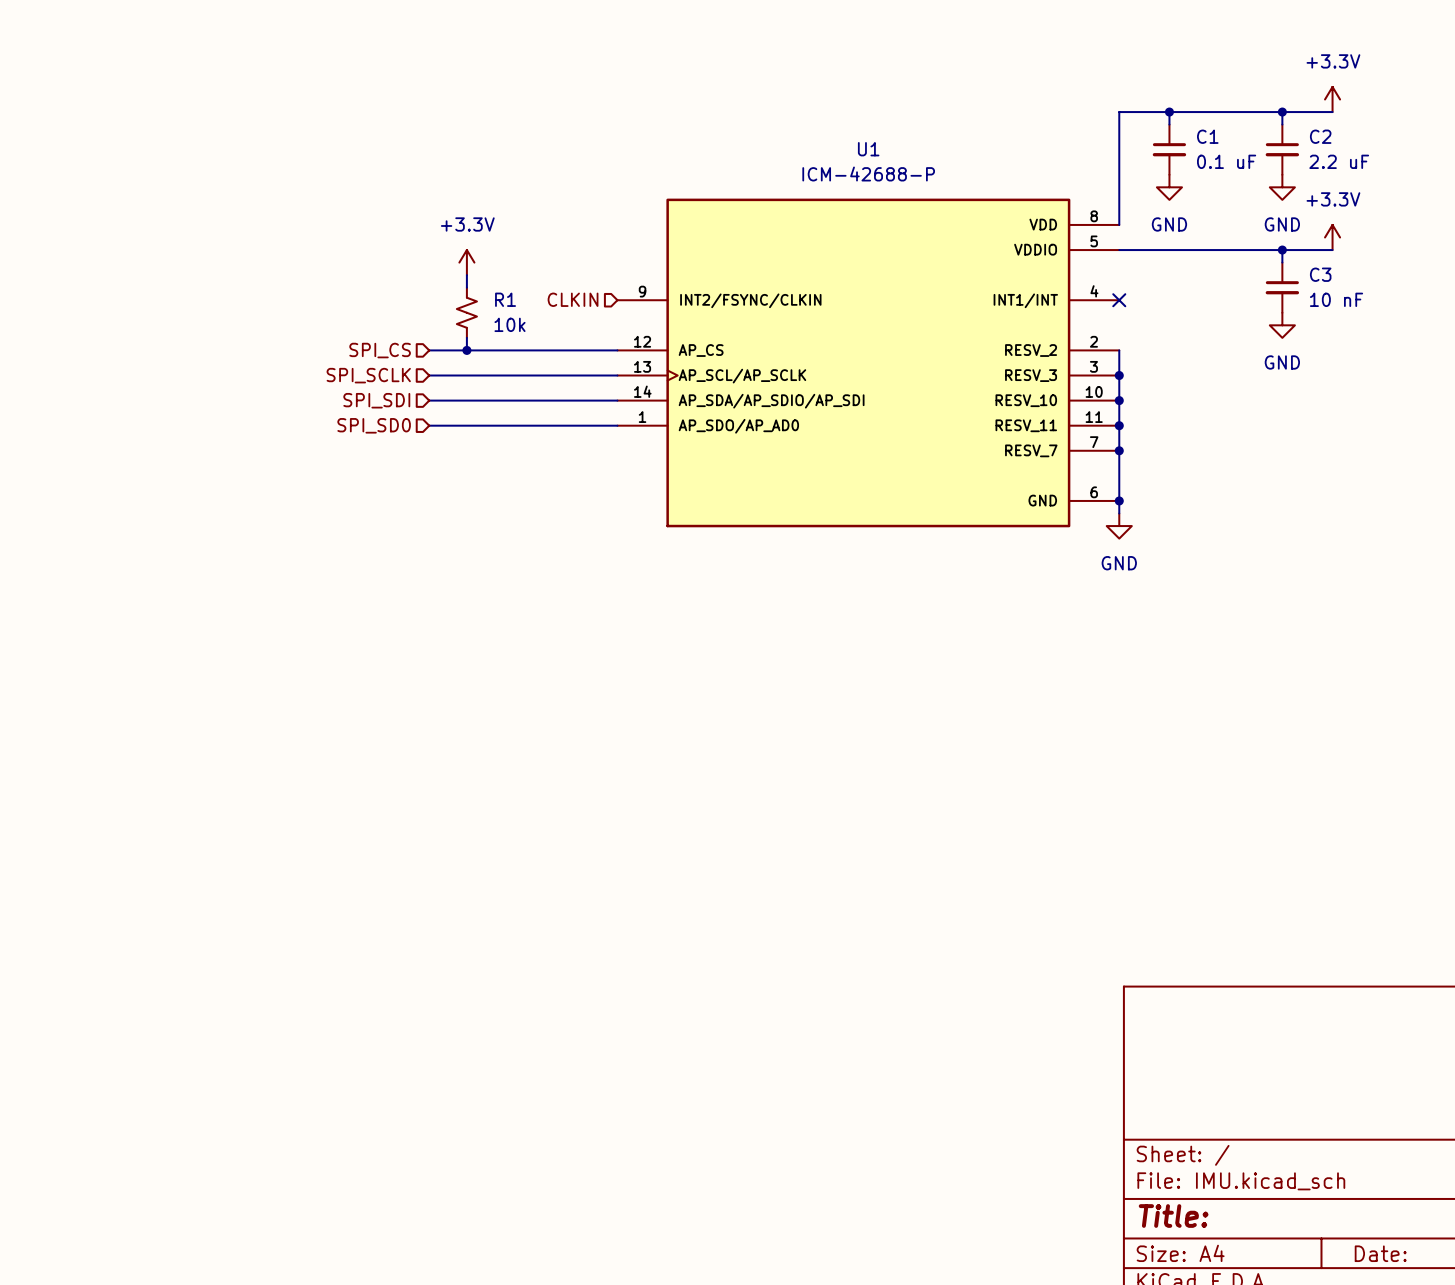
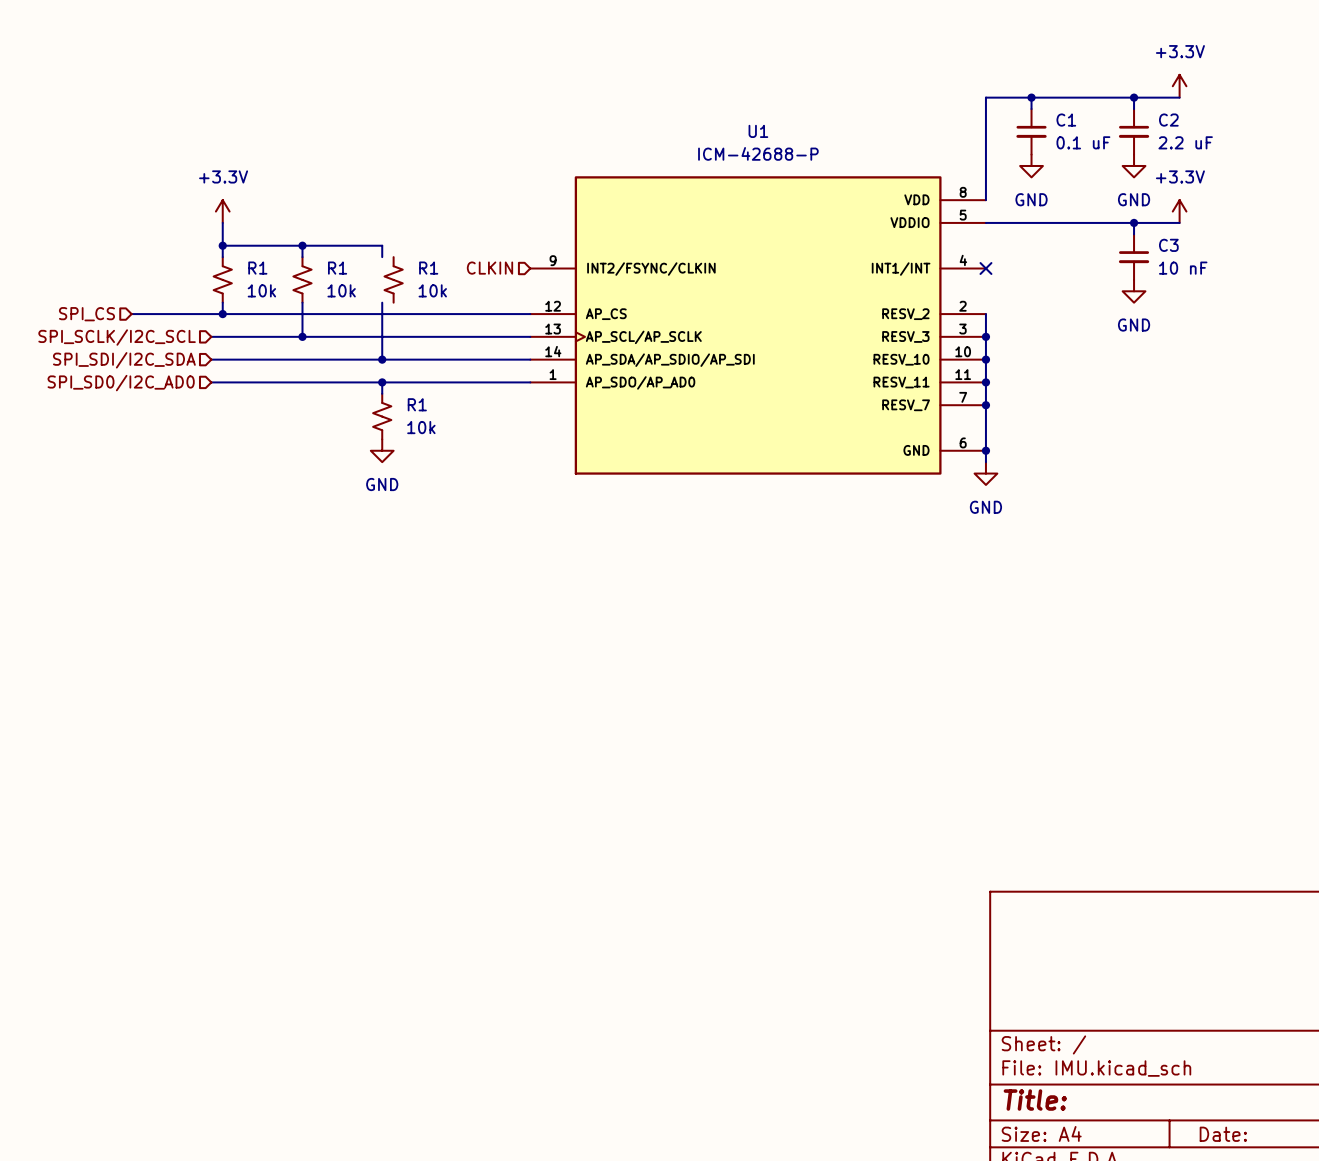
wire: none -> (222, 222) (222, 257)
power symbol position: +3.3V (466, 262) -> +3.3V (222, 211)
wire: none -> (222, 245) (382, 245) (382, 257)
junction: none -> (222, 245)
junction: none -> (302, 245)
wire: (466, 275) (466, 287) -> (302, 245) (302, 257)
R1: none -> 10k (222, 279)
R1: none -> 10k (302, 279)
wire: none -> (222, 302) (222, 314)
wire: none -> (302, 302) (302, 336)
wire: none -> (382, 302) (382, 359)
wire: (466, 337) (466, 350) -> (382, 382) (382, 393)
hierarchical label: none -> SPI_CS (86, 314)
wire: none -> (131, 314) (359, 314)
junction: none -> (222, 314)
hierarchical label: SPI_CS (380, 350) -> none
junction: (466, 350) -> none
wire: none -> (211, 336) (359, 336)
junction: none -> (302, 336)
hierarchical label: SPI_SCLK (368, 375) -> none
hierarchical label: none -> SPI_SCLK/I2C_SCL (117, 337)
wire: none -> (211, 359) (359, 359)
hierarchical label: SPI_SDI (376, 400) -> none
junction: none -> (382, 359)
hierarchical label: none -> SPI_SDI/I2C_SDA (124, 360)
wire: none -> (211, 382) (359, 382)
hierarchical label: SPI_SD0 (374, 425) -> none
junction: none -> (382, 382)
hierarchical label: none -> SPI_SD0/I2C_AD0 (121, 383)
R1: none -> 10k (382, 416)
power symbol: none -> GND (382, 450)

